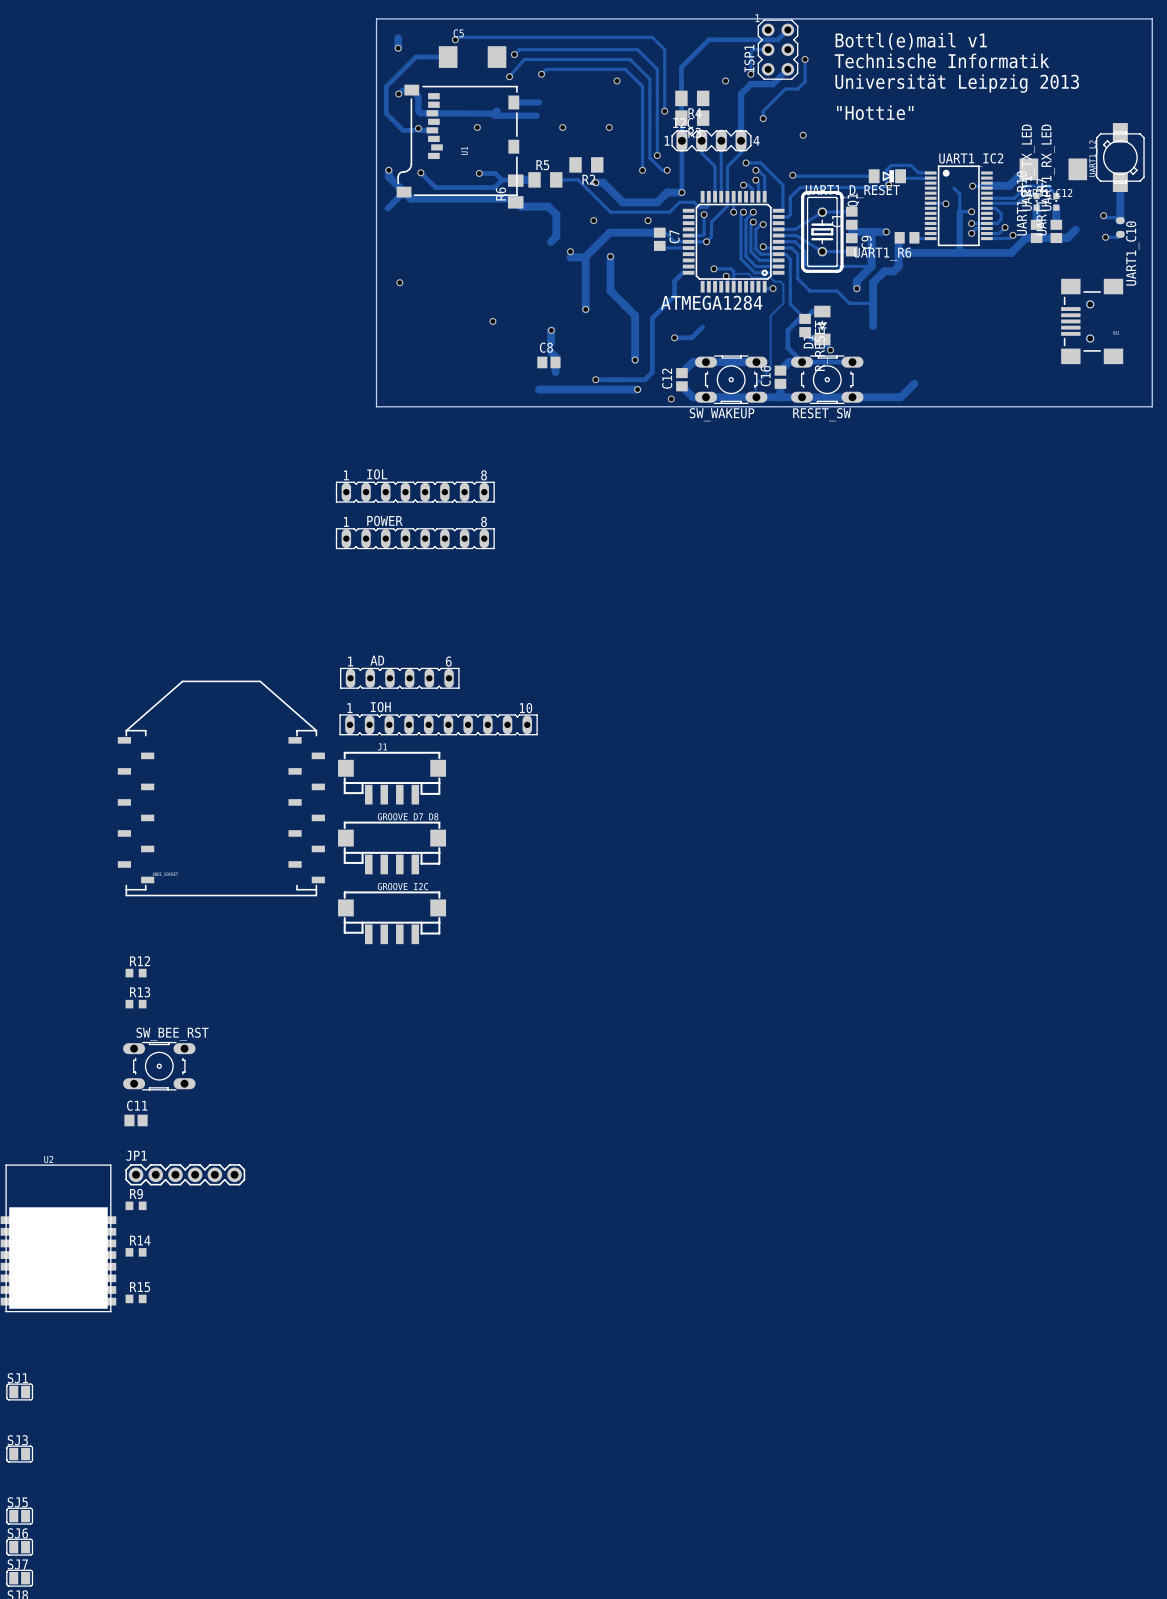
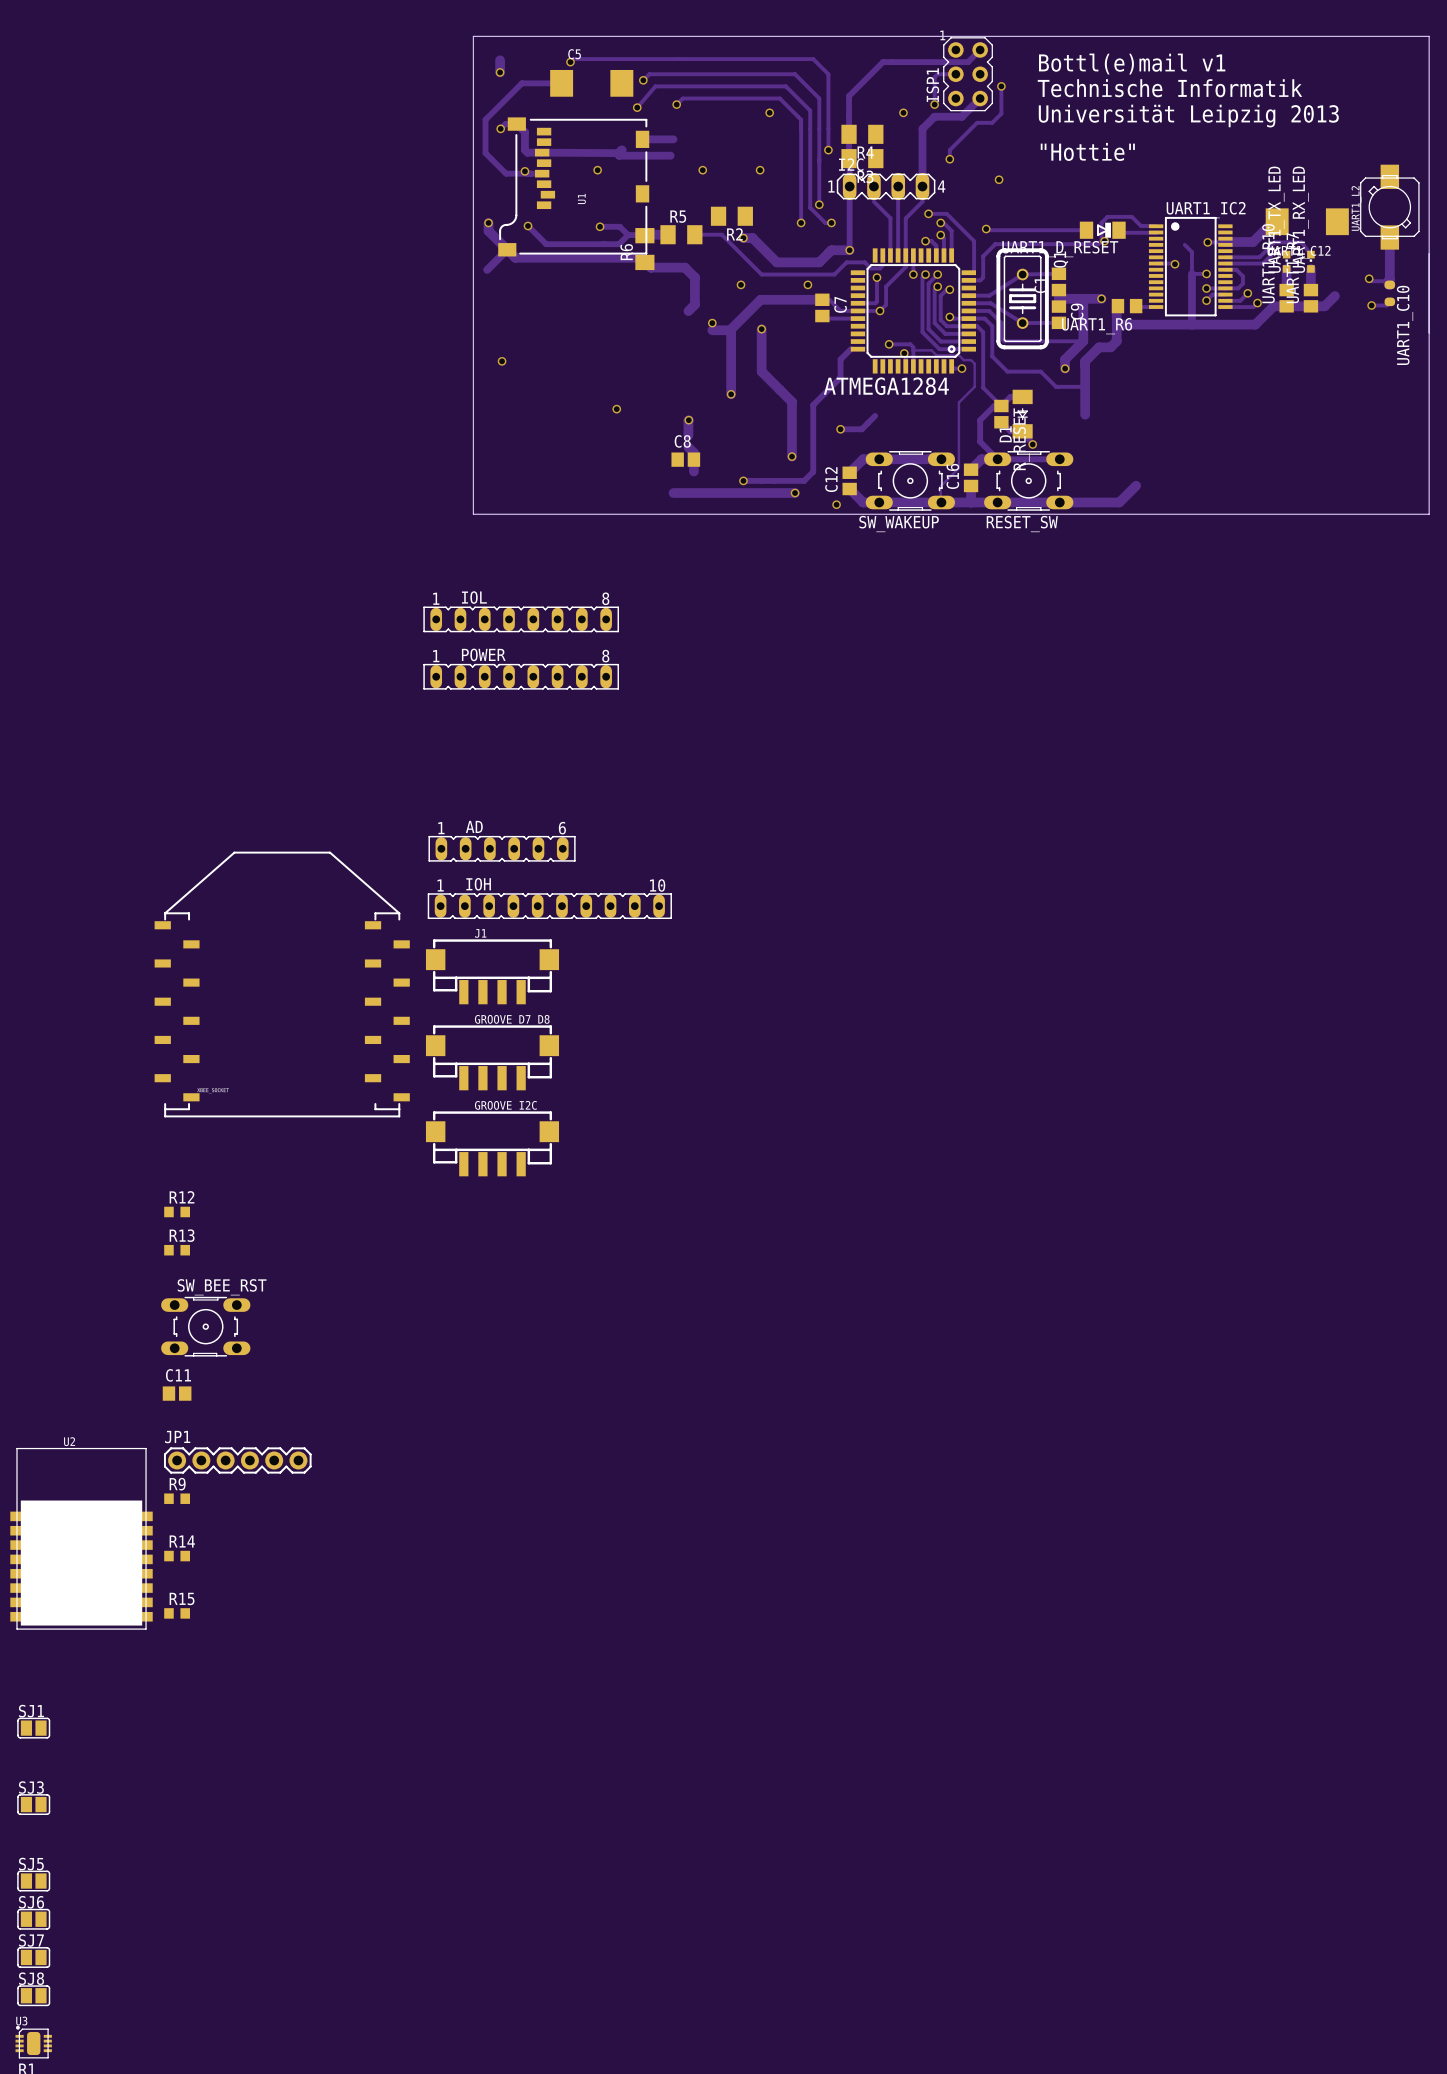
part: none -> (1429, 293)
part: (1092, 321) -> none

